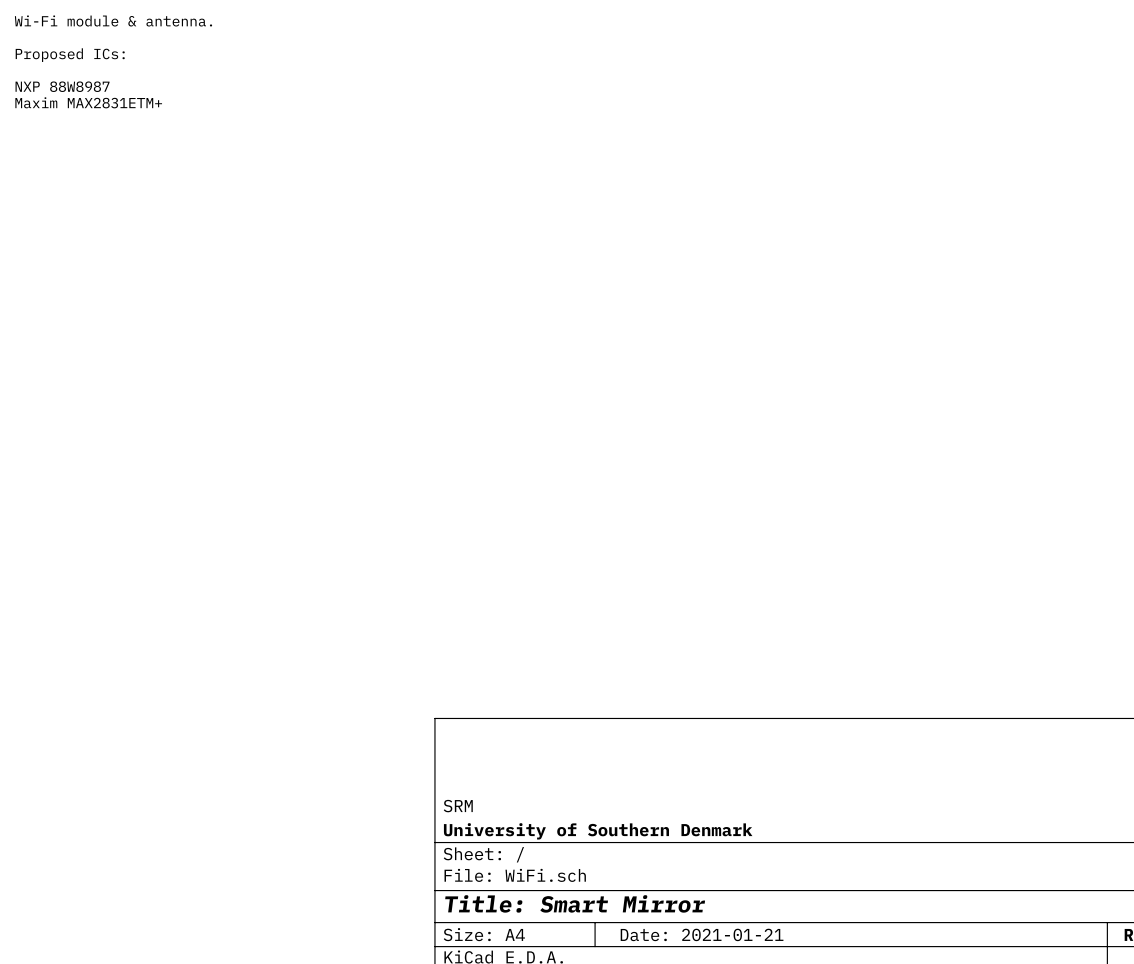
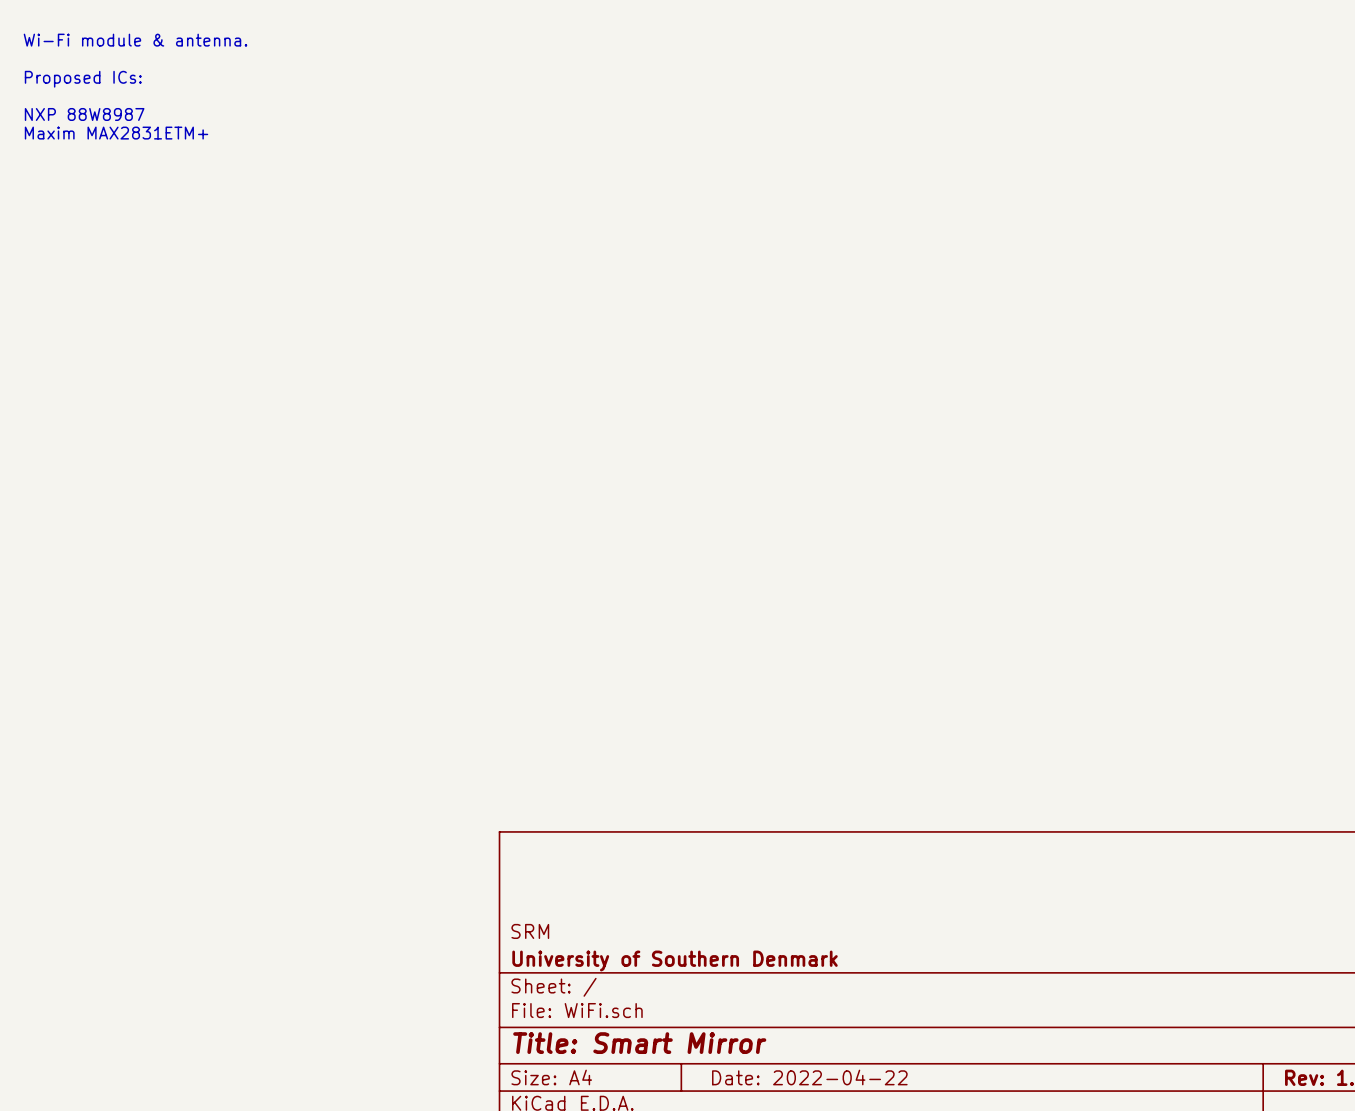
title block: Date: 2021-01-21 (702, 934) -> Date: 2022-04-22 (809, 1077)

